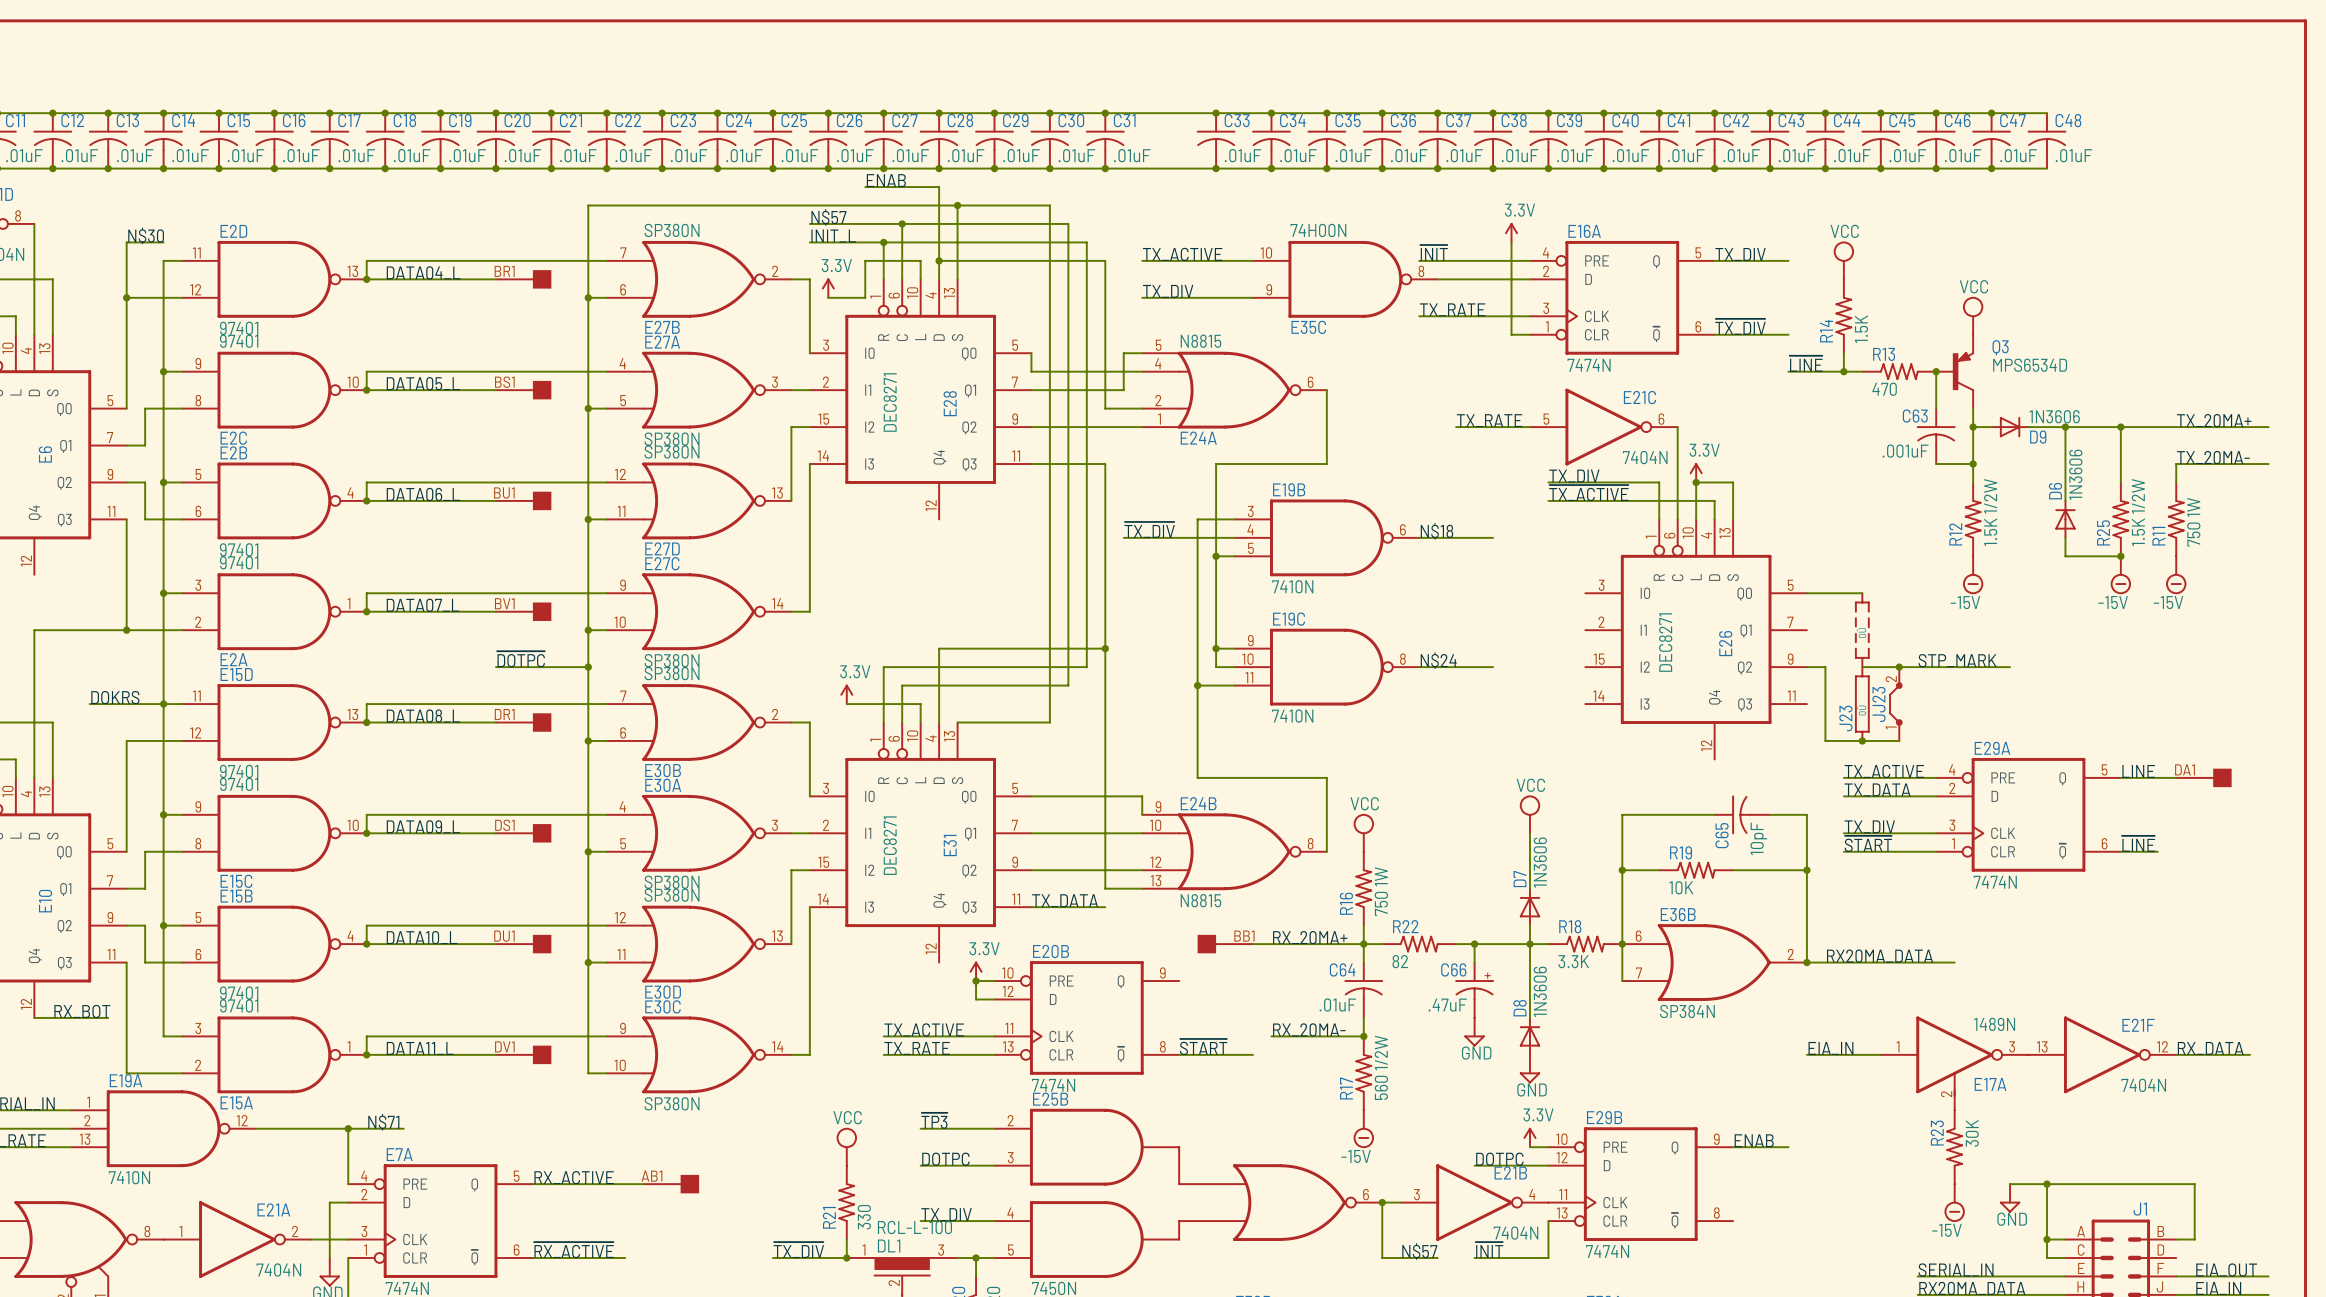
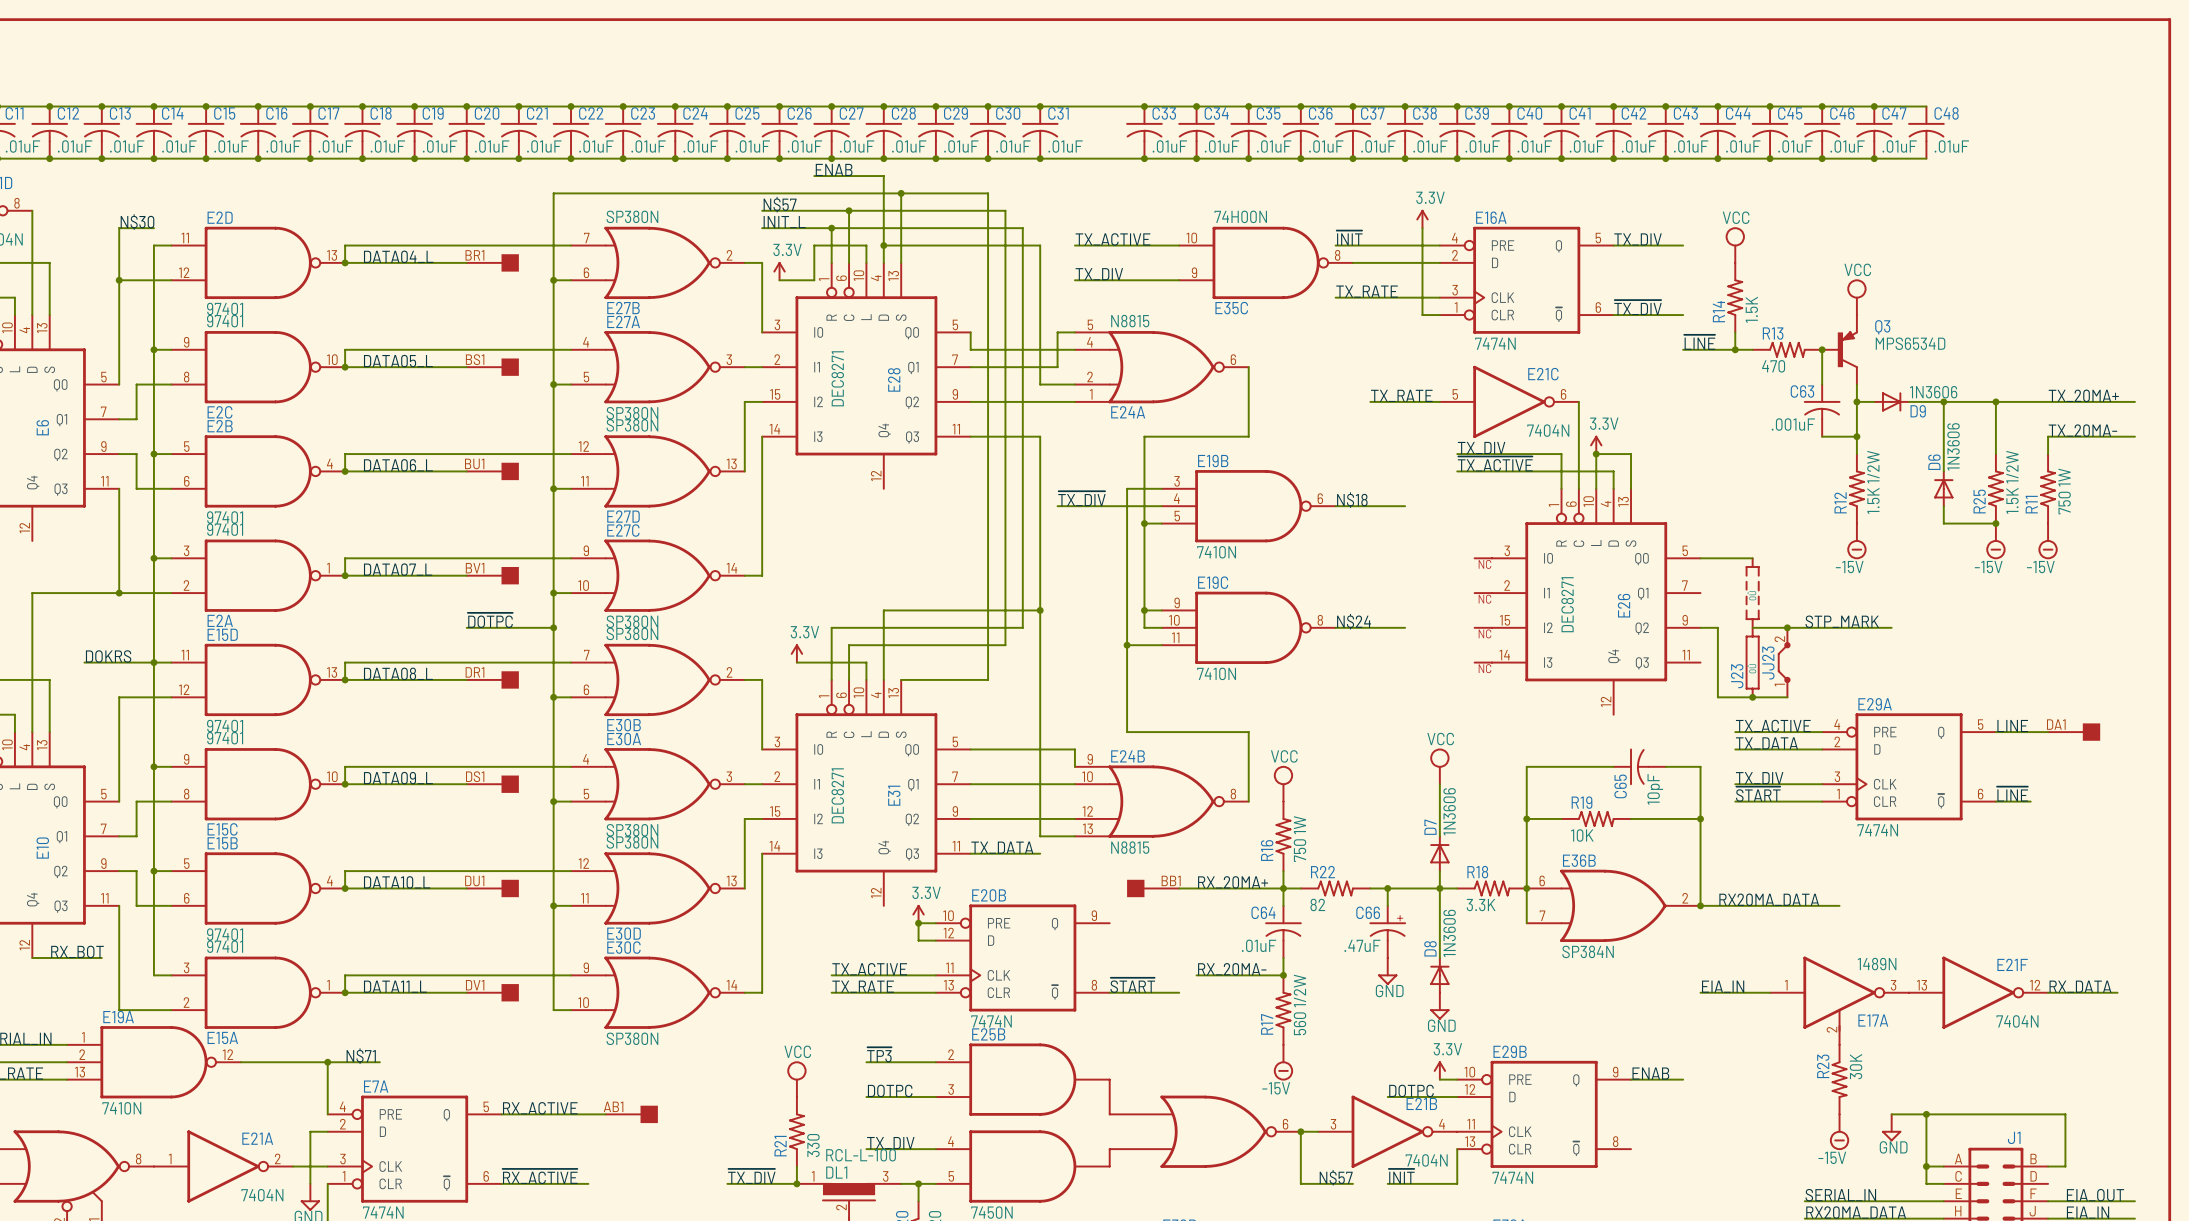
power symbol: none -> (1483, 558)
power symbol: none -> (1483, 593)
power symbol: none -> (1483, 627)
power symbol: none -> (1483, 662)

